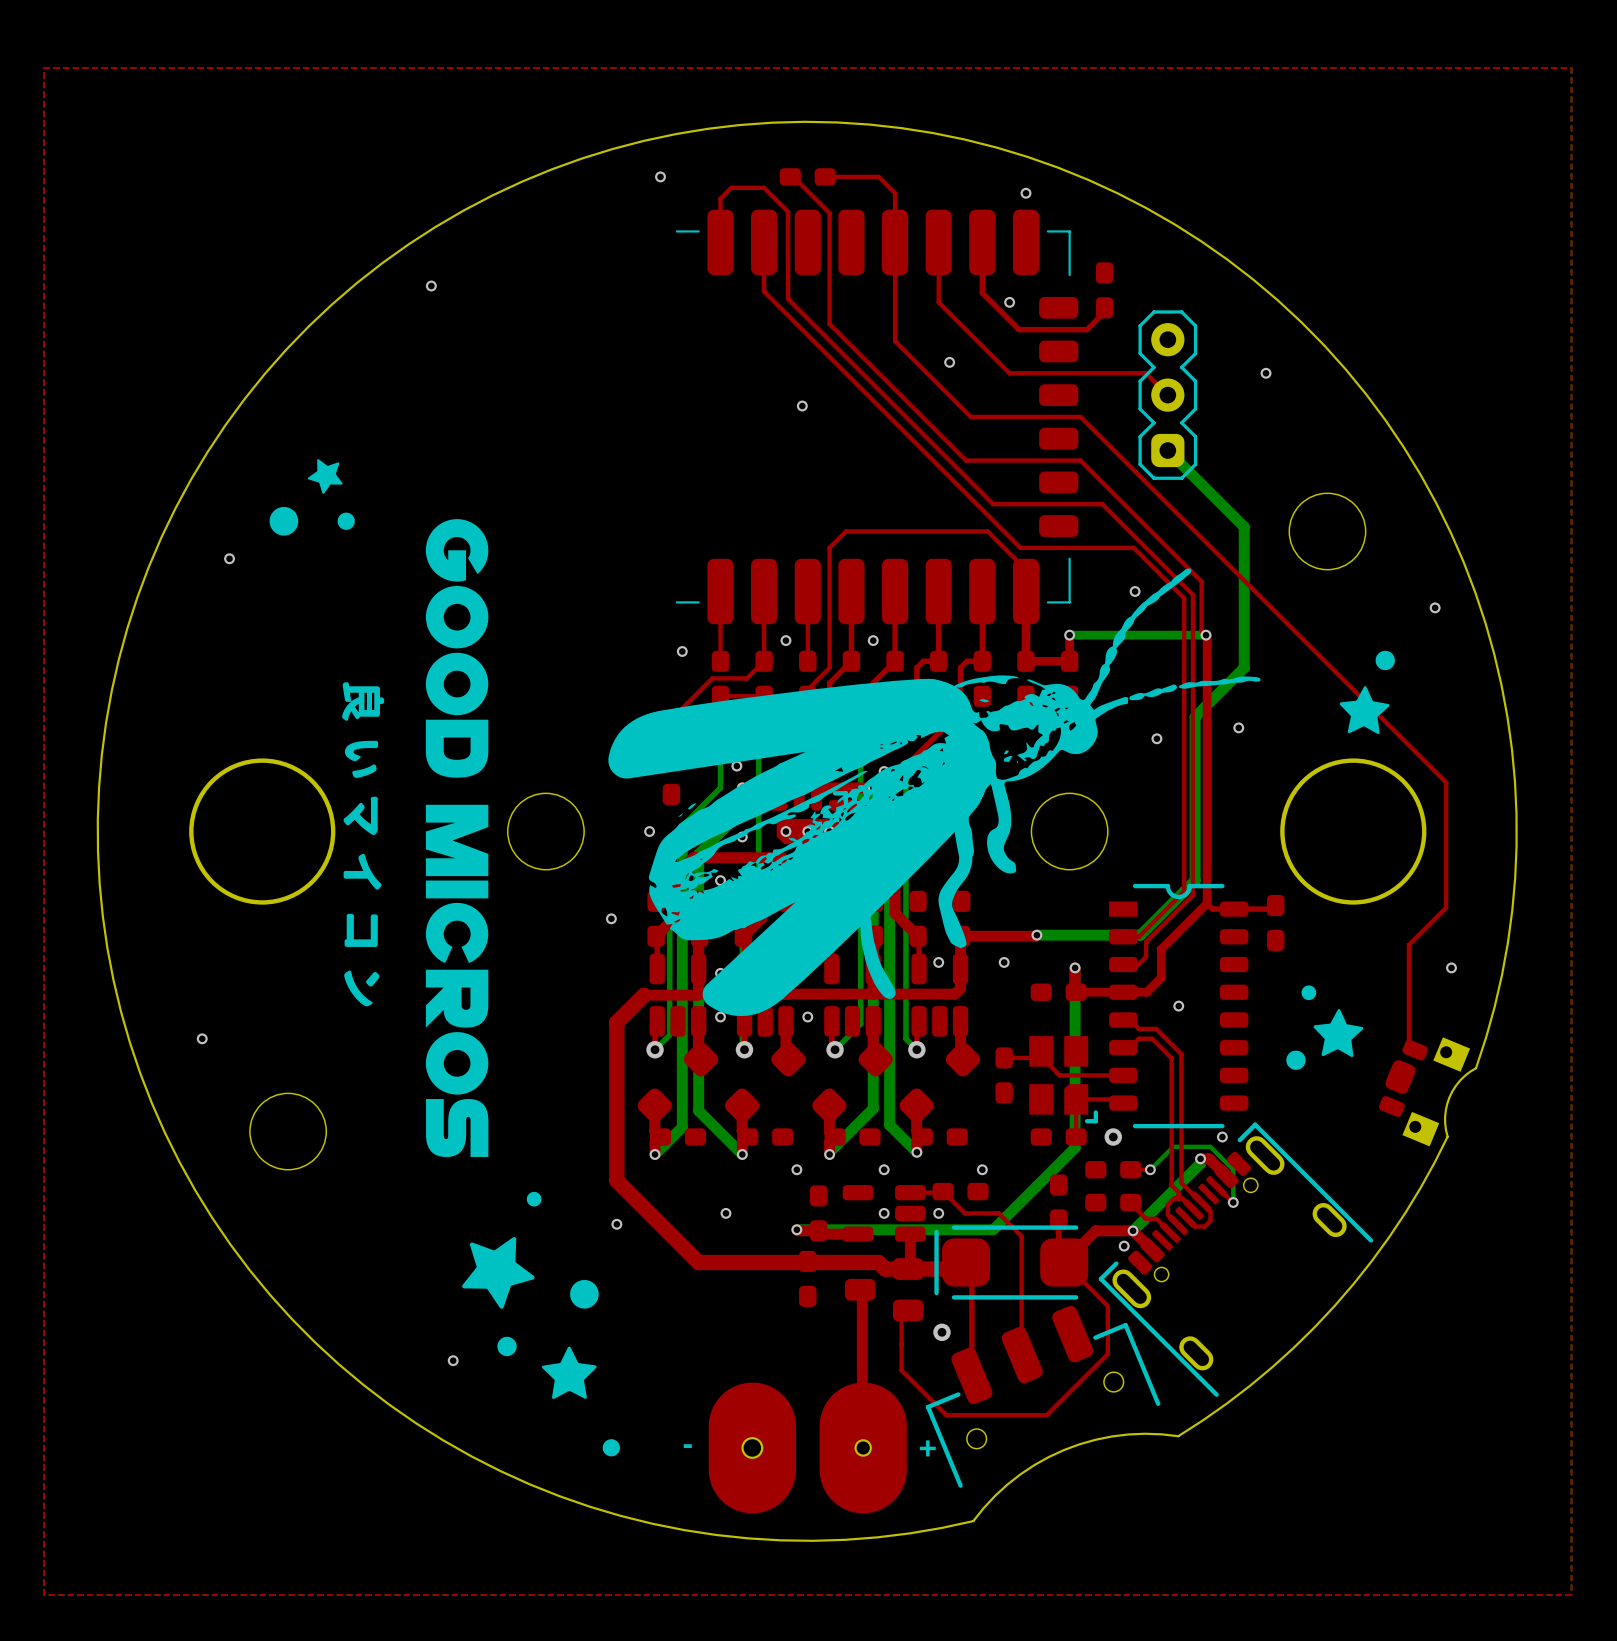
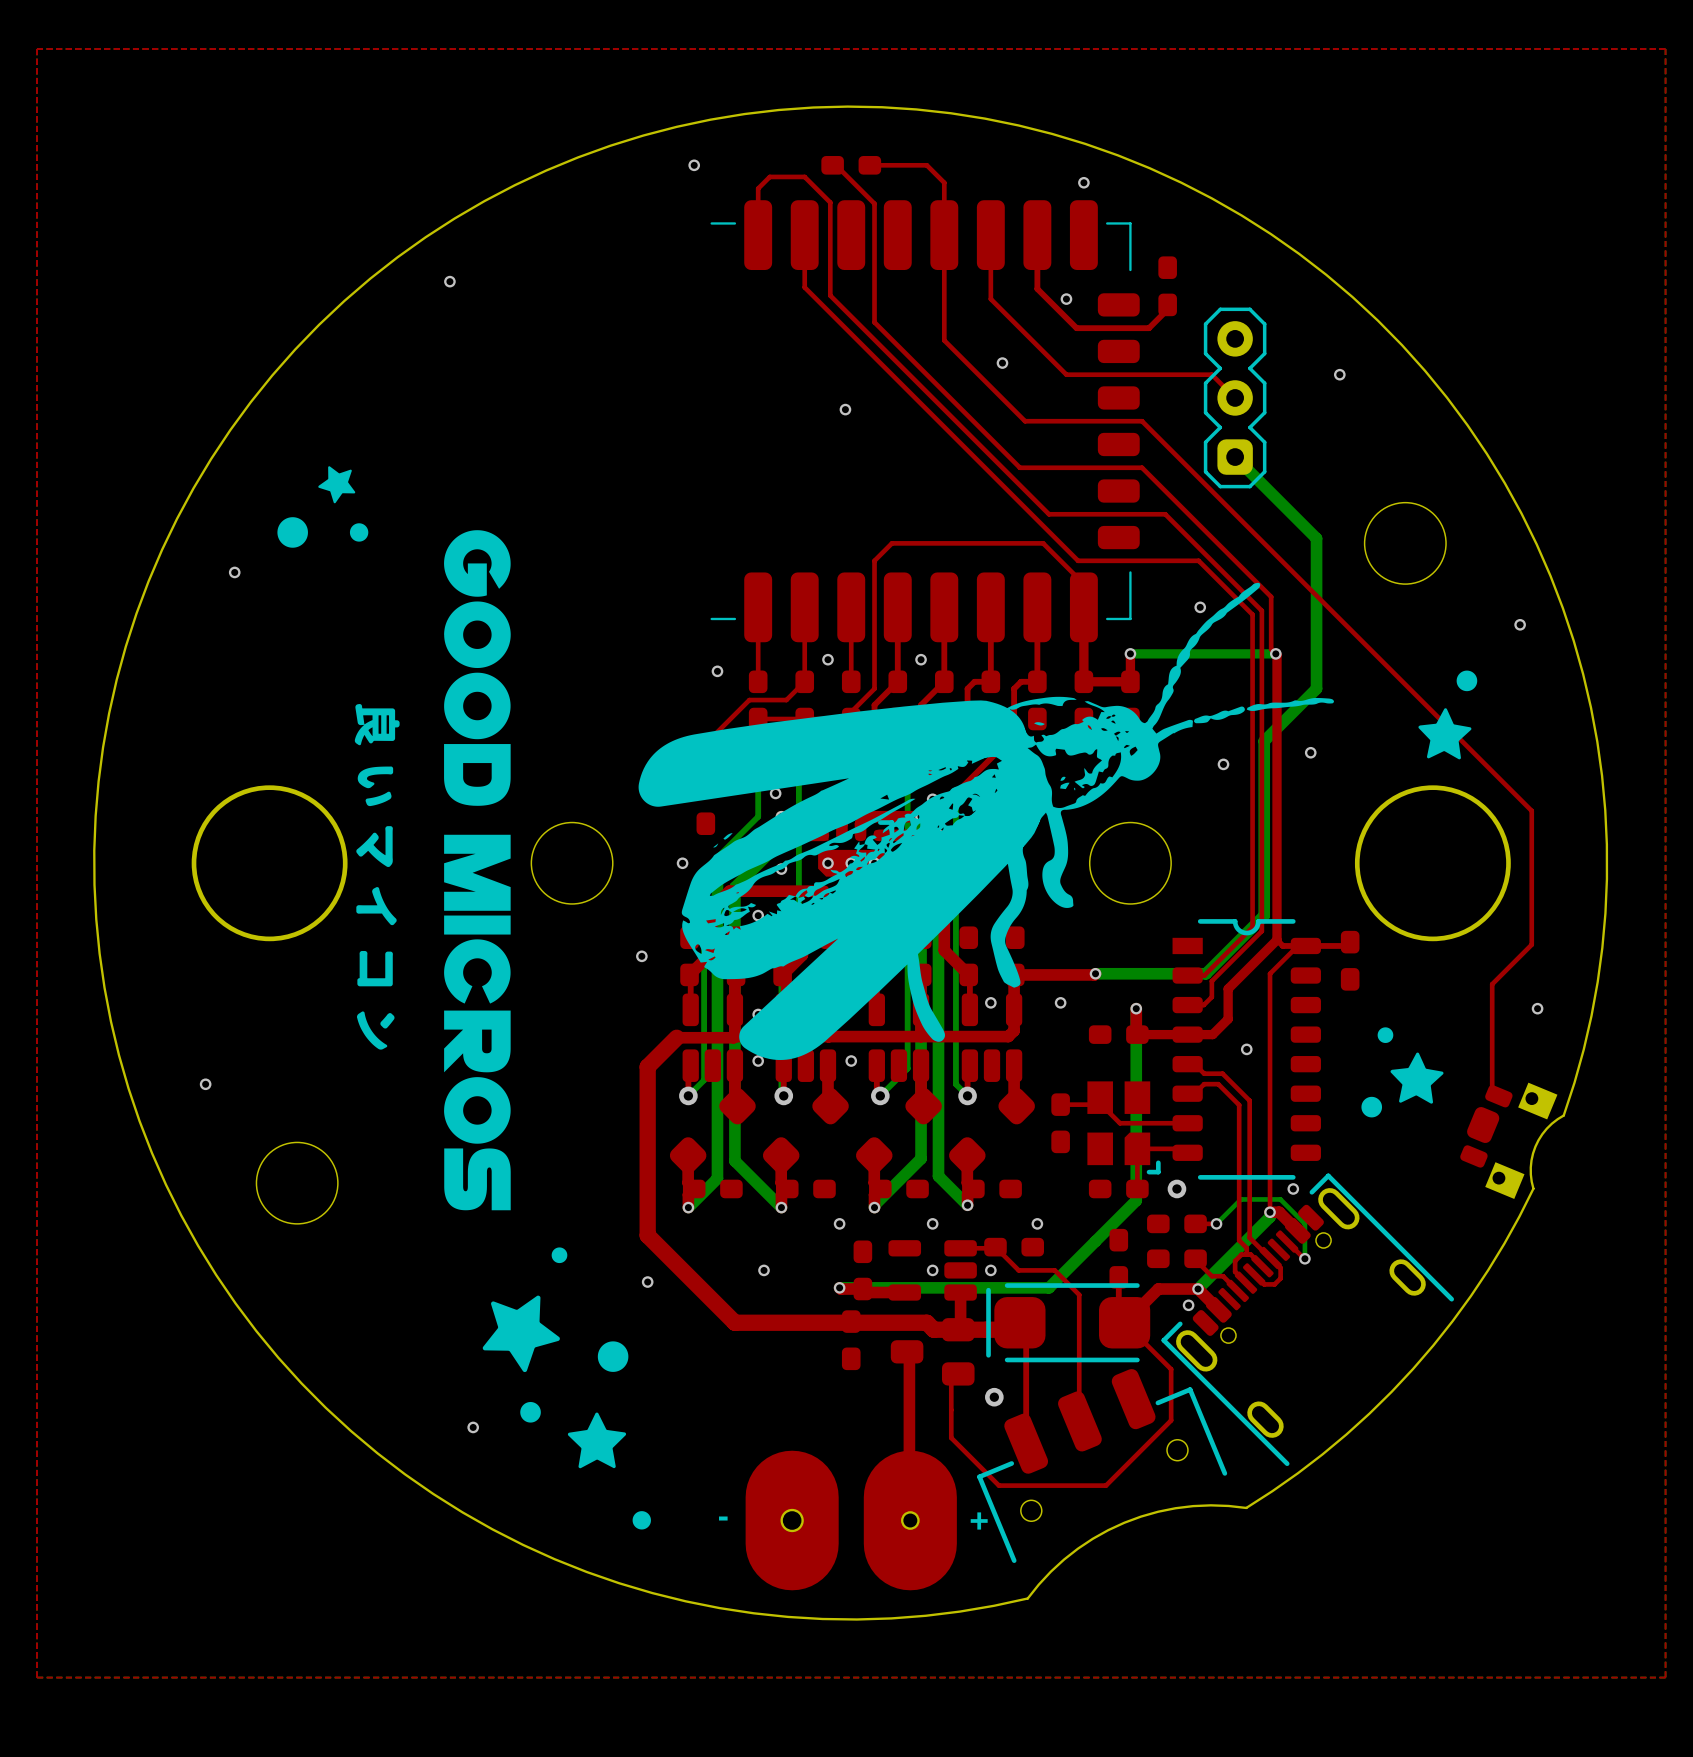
top track: none -> (1297, 945) (1270, 973) (1270, 1212)

